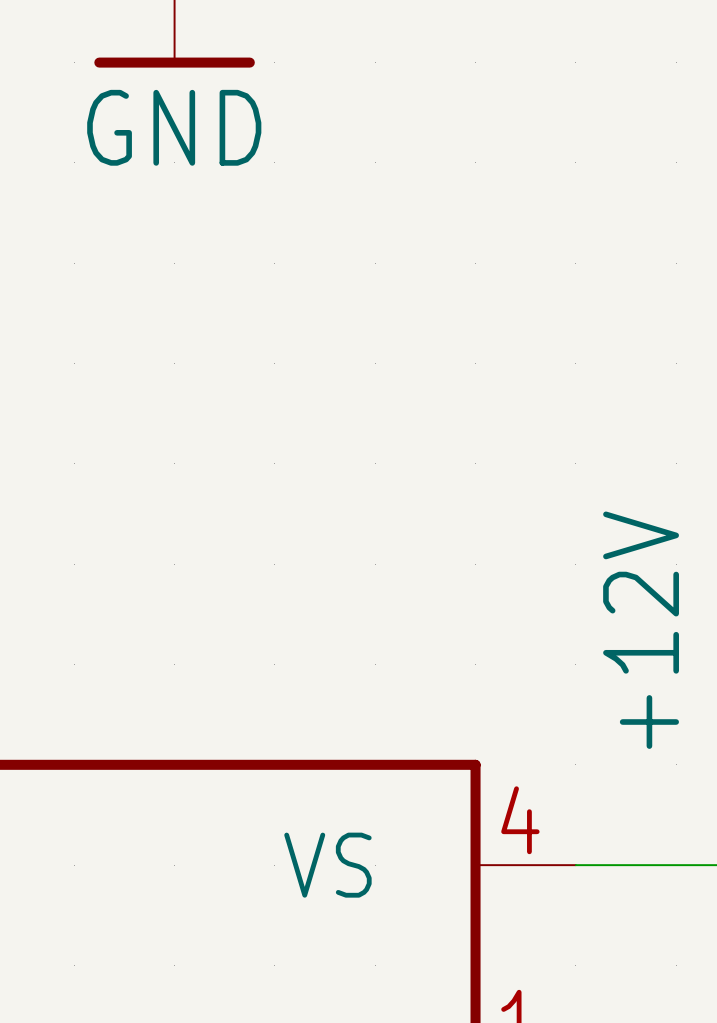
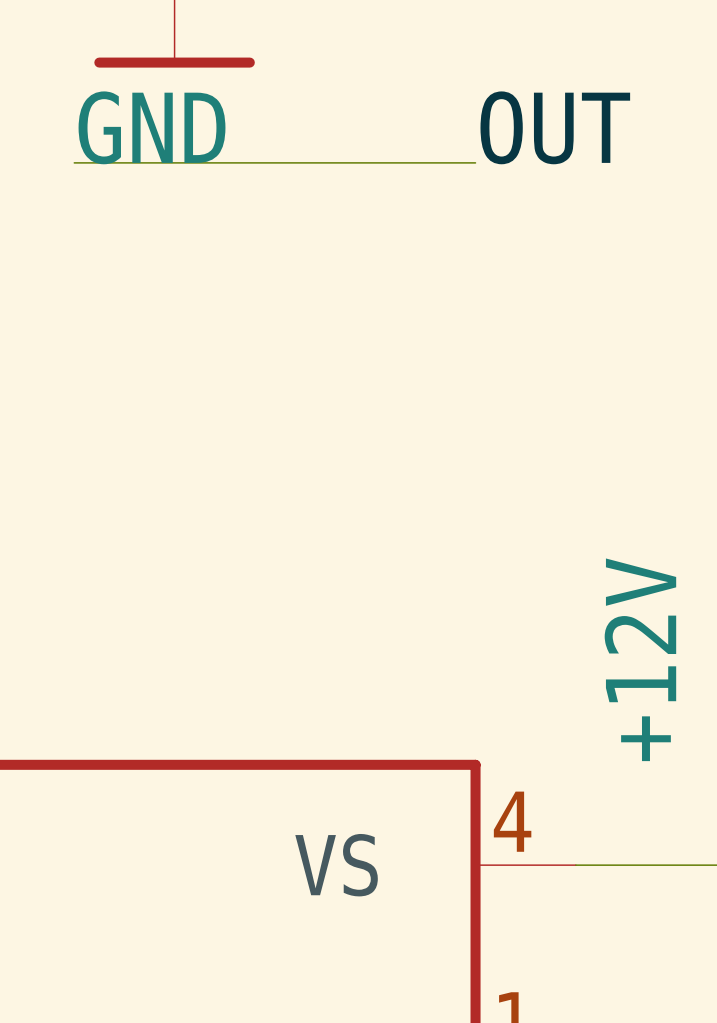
label: none -> OUT (555, 127)
wire: none -> (74, 162) (475, 162)

